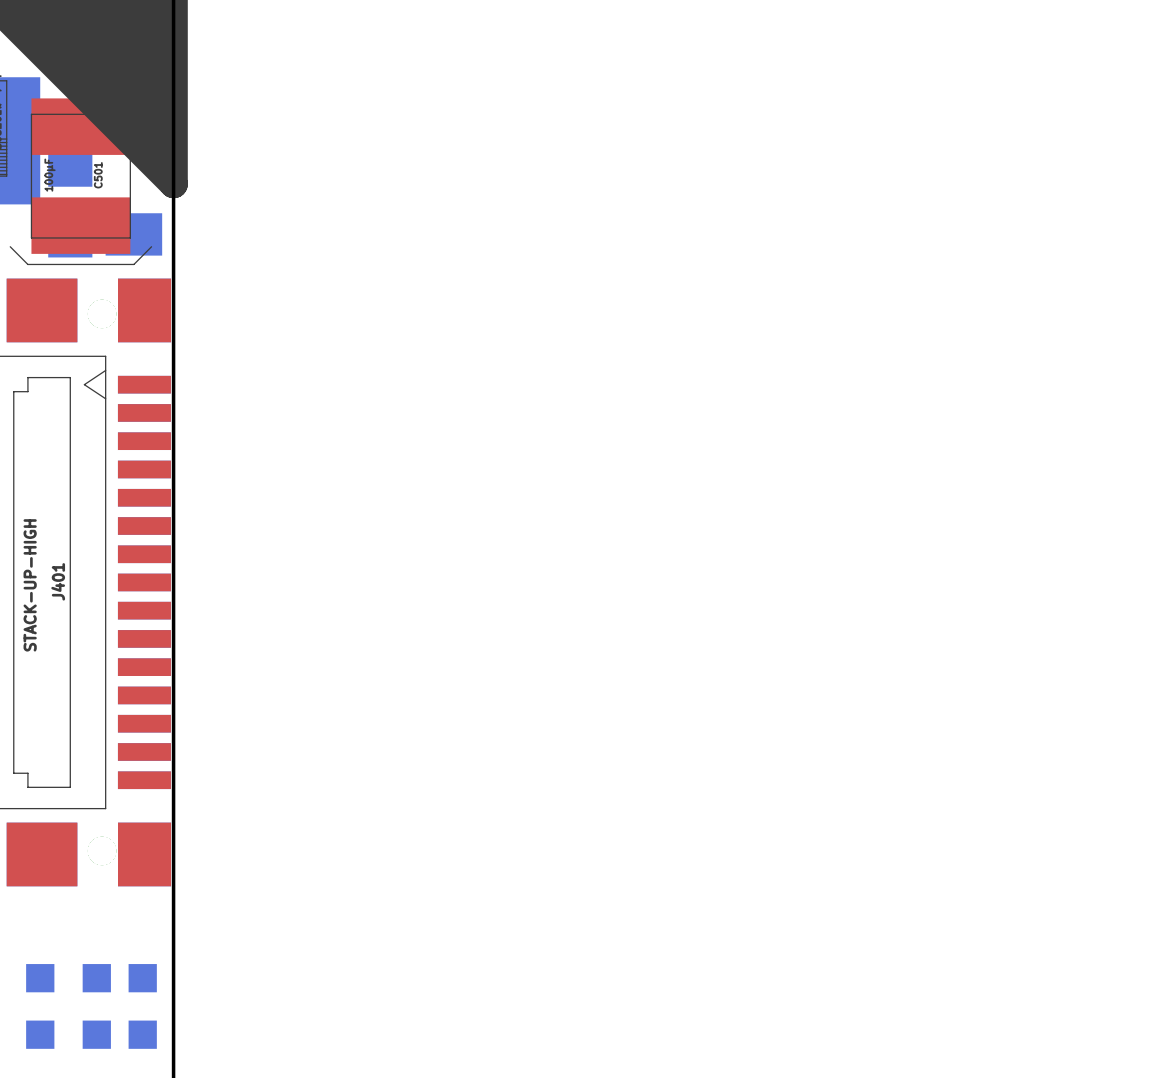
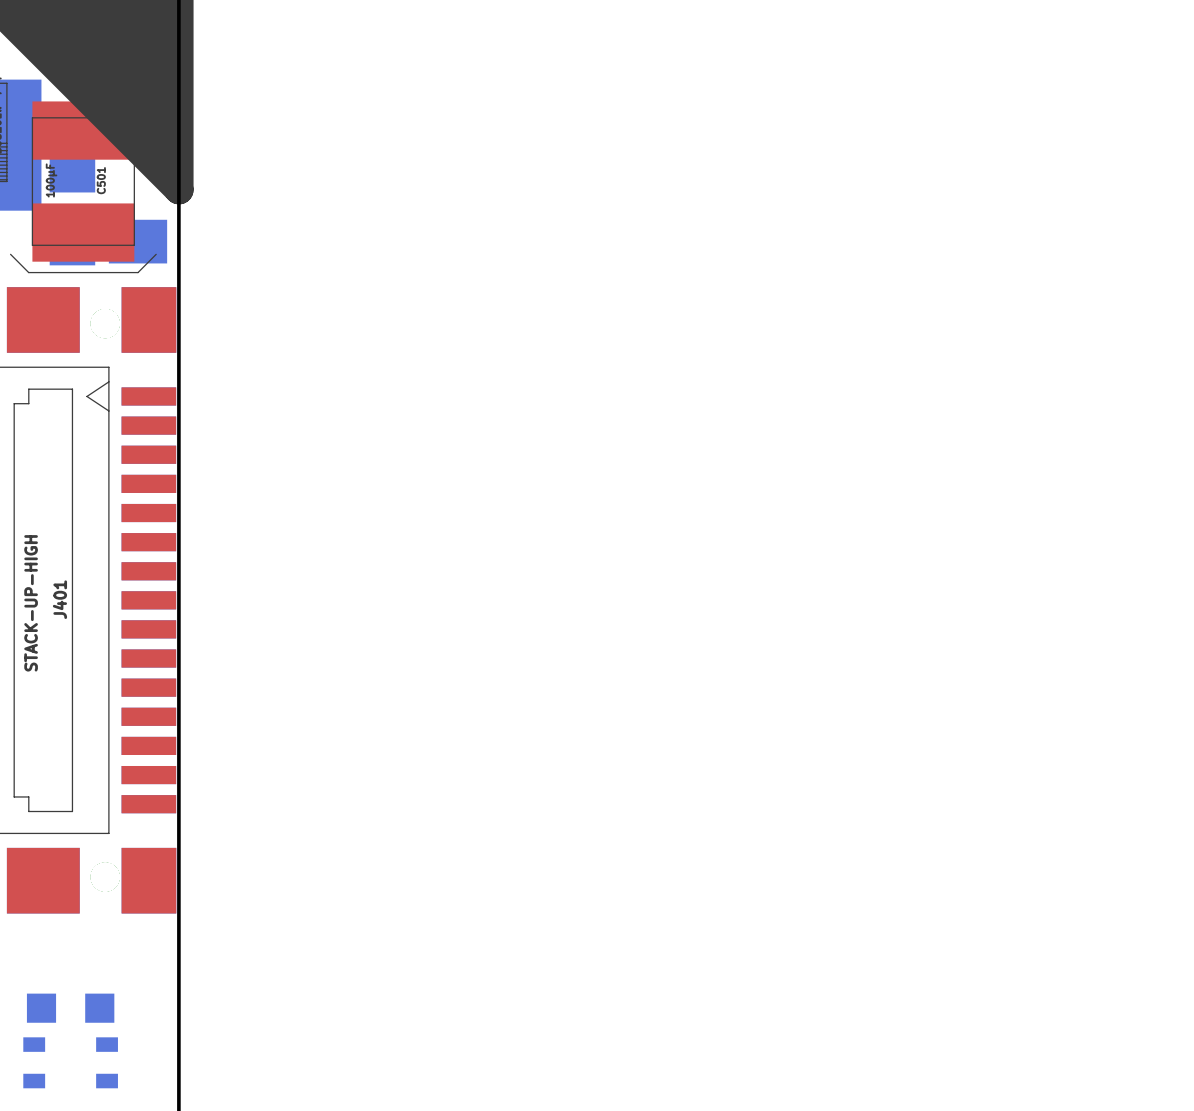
part: (142, 1006) -> none
part: none -> (34, 1062)
part: none -> (107, 1062)
part: (68, 1034) -> none

